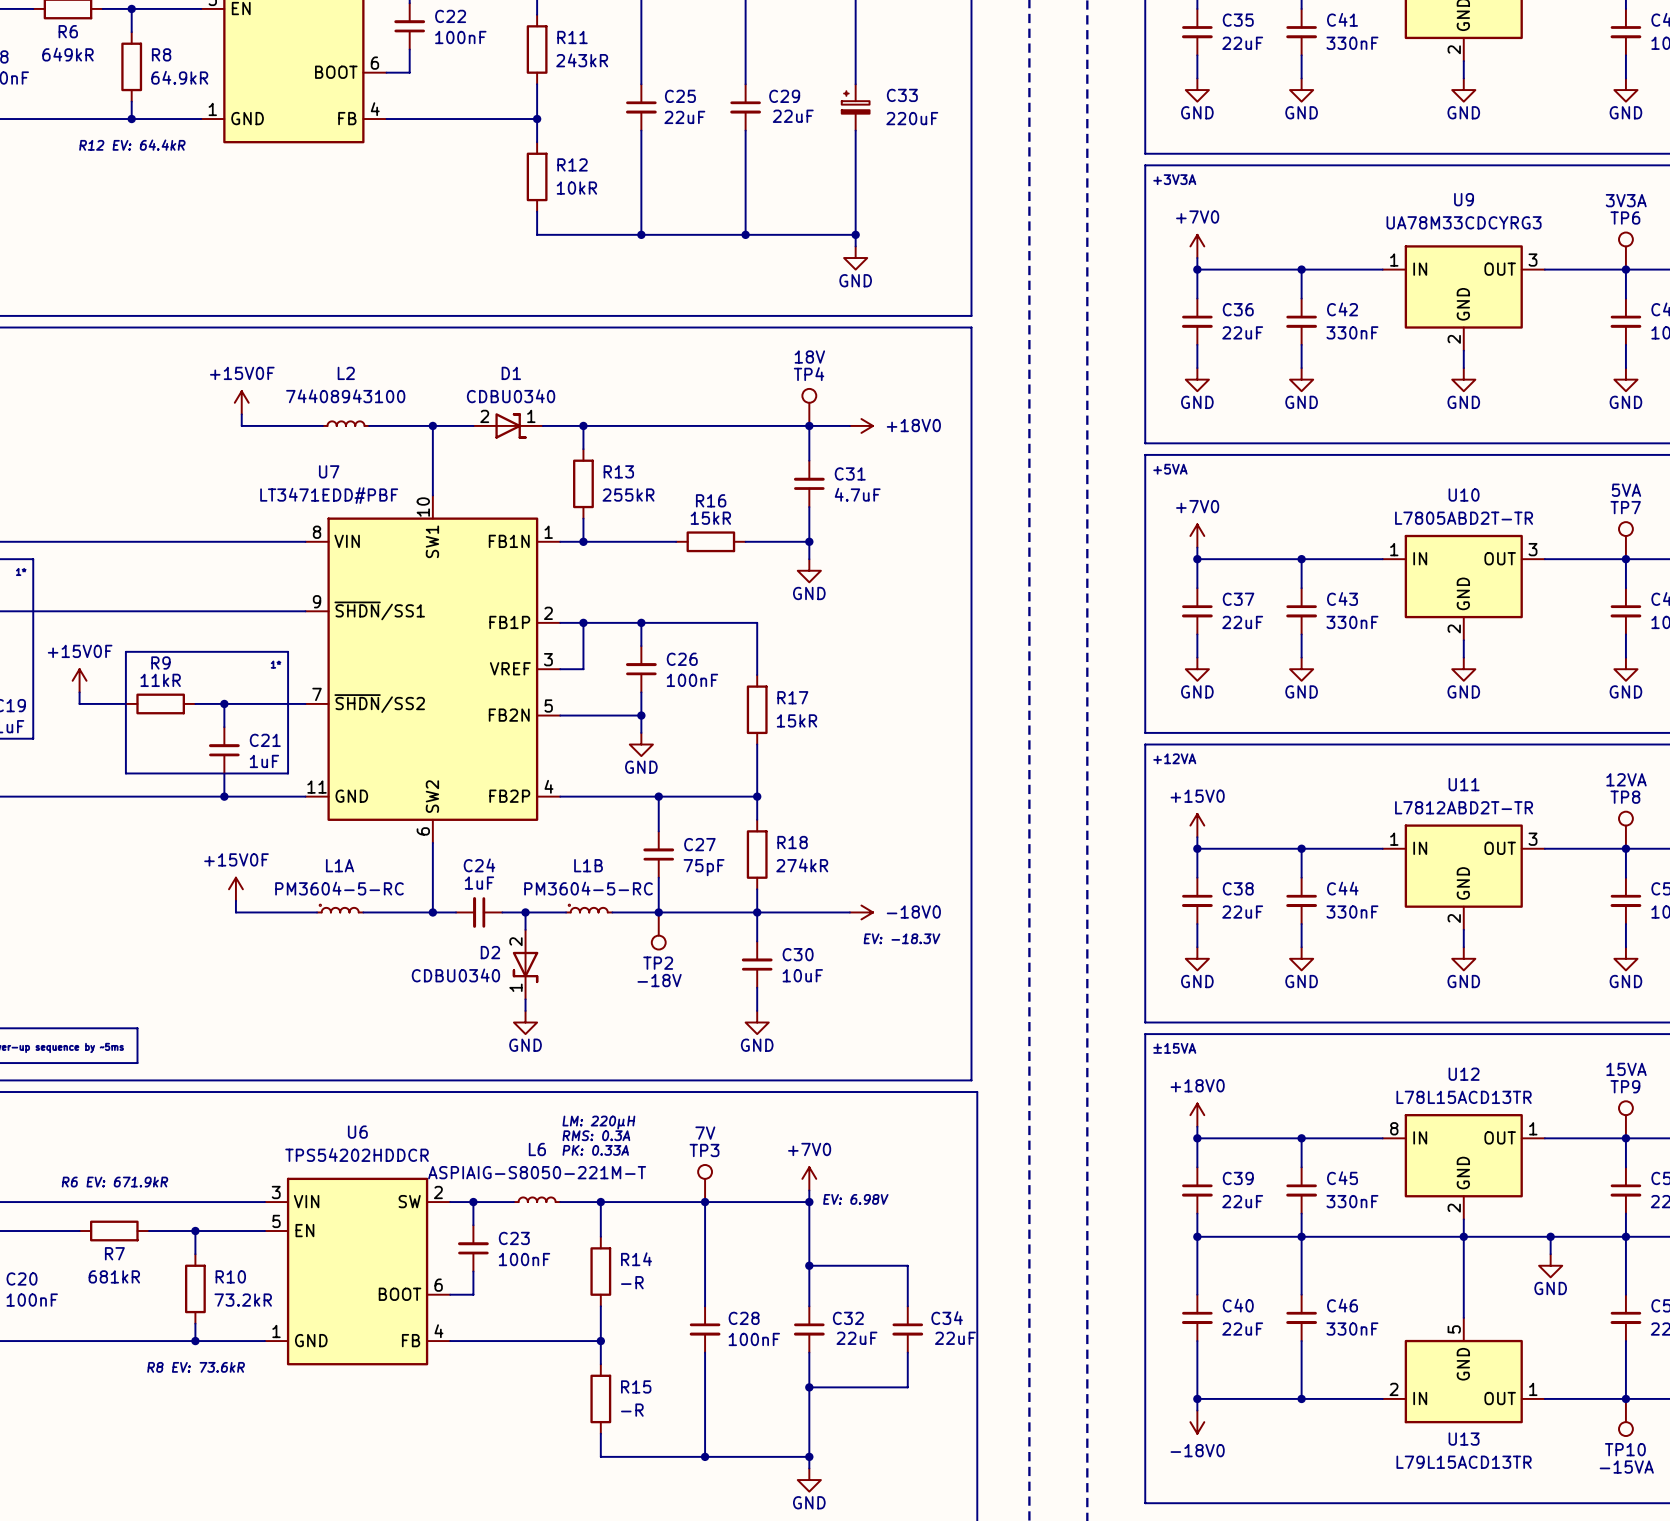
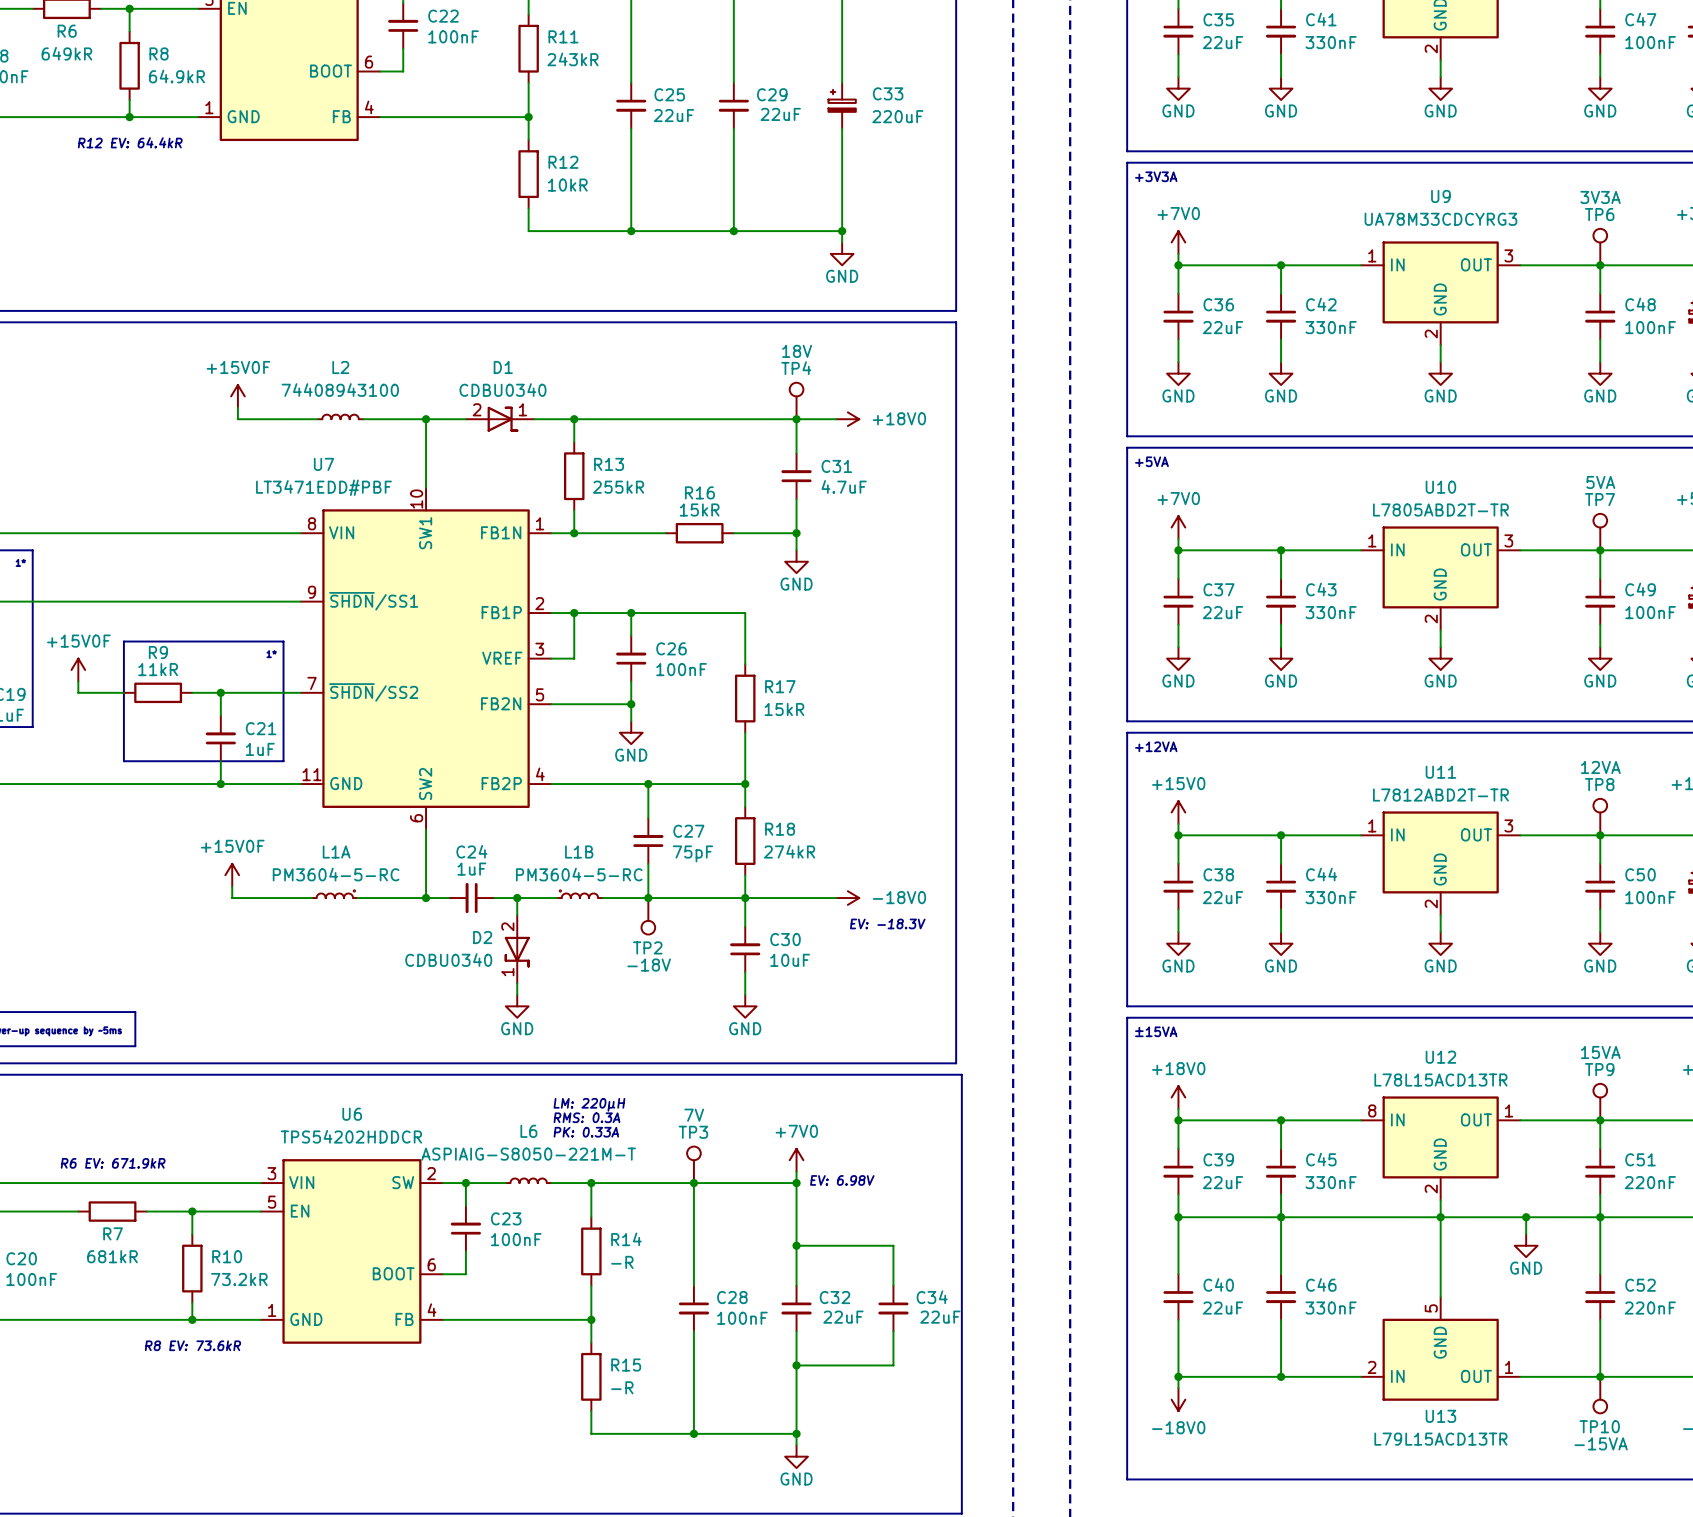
L1A flip: as is (339, 908) -> left-right (335, 894)

